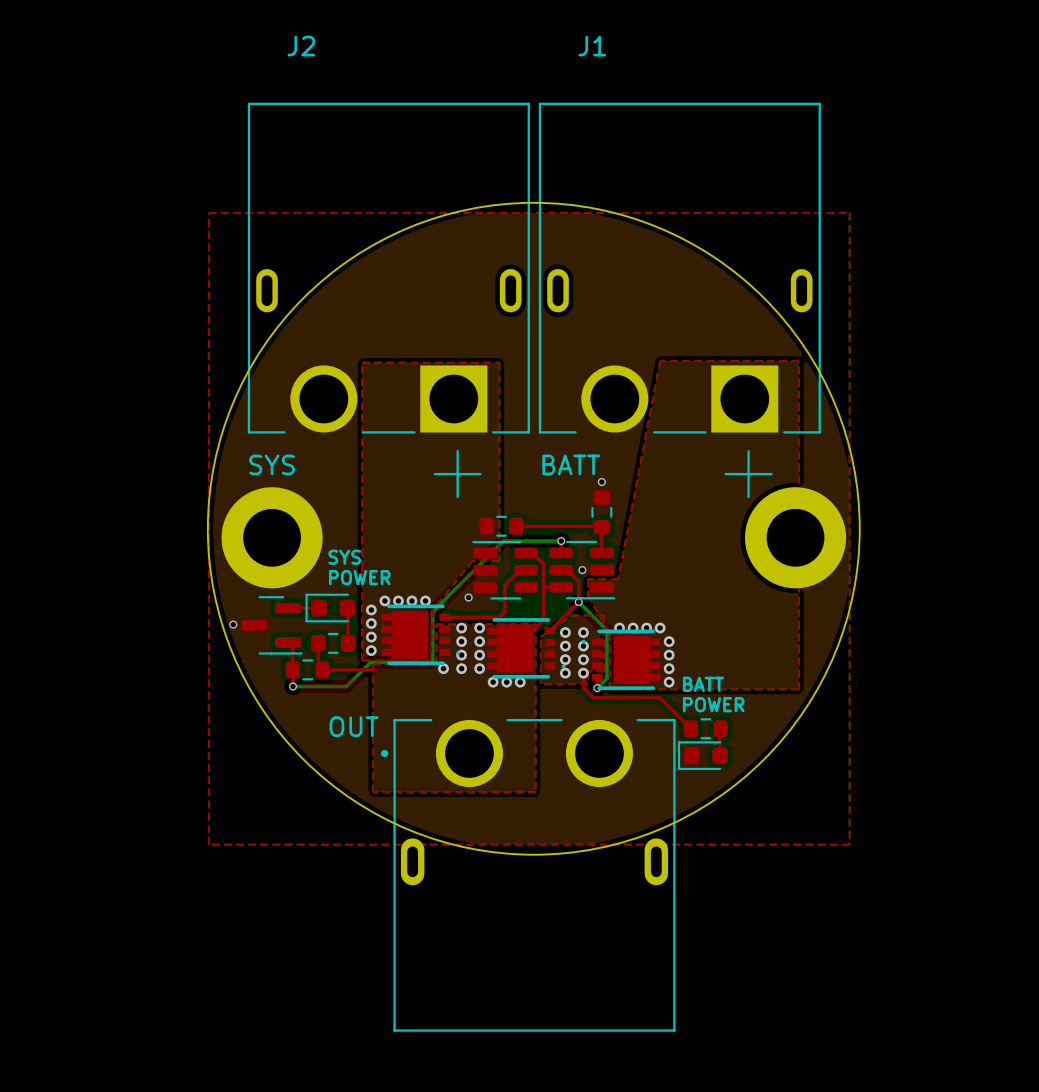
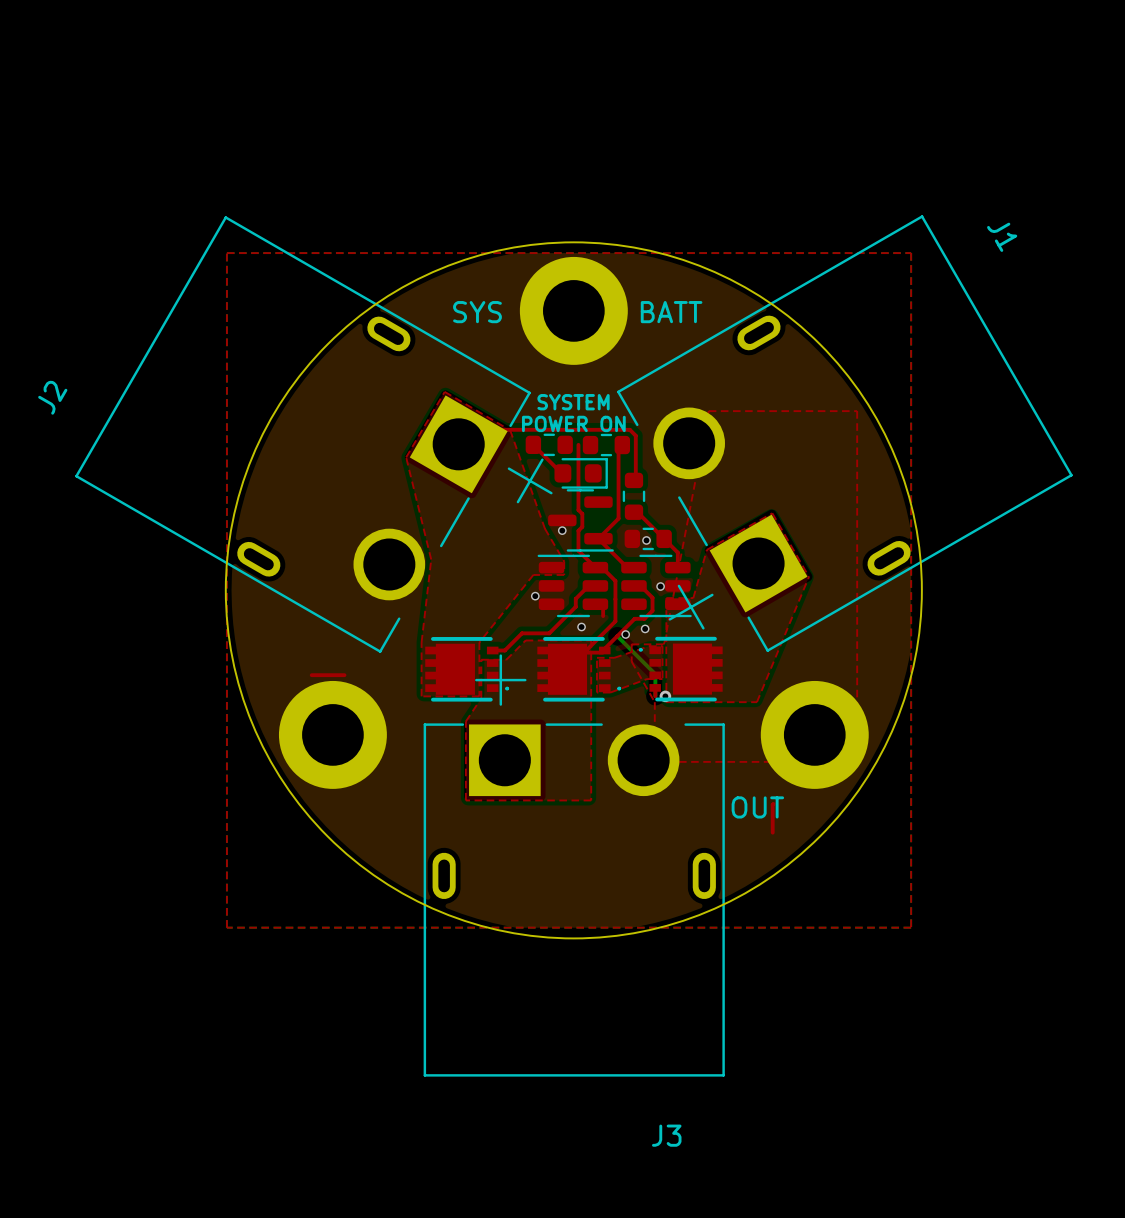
part: none -> (573, 310)
text: none -> SYS (477, 312)
J2 rotation: 0° (388, 300) -> 60° counterclockwise (313, 434)
J1 rotation: 0° (679, 300) -> 60° clockwise (844, 433)
text: none -> SYSTEM (573, 402)
top zone outline: (362, 362) (362, 660) (430, 660) (432, 609) (472, 561) (499, 561) (499, 362) (362, 362) -> (444, 391) (406, 457) (431, 559) (421, 642) (421, 696) (479, 696) (479, 642) (533, 574) (564, 574) (564, 561) (544, 528) (510, 430) (444, 391)
text: none -> POWER ON (573, 423)
top track: none -> (458, 444) (473, 429) (629, 429) (635, 435) (635, 478) (633, 480)
top track: none -> (533, 445) (562, 473)
part: none -> (549, 444)
top track: none -> (578, 444) (578, 510) (582, 513) (582, 526) (578, 530) (578, 550) (595, 567) (602, 567) (615, 580) (615, 621) (567, 669)
part: none -> (606, 445)
top track: none -> (622, 445) (618, 448) (618, 518) (598, 538)
part: none -> (581, 473)
part: none -> (633, 496)
top track: none -> (633, 512) (637, 512) (677, 552) (677, 567)
top zone outline: none -> (772, 513) (808, 576) (756, 702) (666, 702) (666, 598) (693, 598) (706, 549) (772, 513)
text: SYS (272, 464) -> none
text position: BATT (571, 464) -> BATT (671, 312)
via: none -> (562, 530)
top track: none -> (598, 538) (627, 567) (633, 567)
part: none -> (648, 538)
part footprint: [591, 490, 613, 535] -> [621, 554, 692, 618]
part: none -> (572, 585)
top track: none -> (595, 585) (588, 585) (575, 598) (575, 606) (549, 633) (522, 633) (504, 650) (492, 650)
top track: none -> (633, 585) (640, 585) (652, 597) (652, 610) (644, 618) (634, 618) (617, 636)
via: none -> (660, 586)
part: (501, 526) -> none
top track: (516, 526) (600, 526) (602, 552) -> none
via: none -> (535, 596)
part: (272, 537) -> none
part position: (795, 537) -> (814, 734)
bottom track: (561, 541) (503, 541) (432, 611) (432, 662) (370, 662) (346, 686) (293, 686) -> none
via: (561, 541) -> none
top track: (526, 553) (532, 553) (543, 564) (543, 619) (515, 648) -> none
text: SYS (344, 557) -> none
via: none -> (581, 626)
via: none -> (645, 628)
part: (505, 570) -> none
top track: (526, 570) (519, 570) (504, 585) (504, 611) (499, 617) (444, 617) -> none
top track: (561, 570) (567, 570) (578, 581) (578, 602) (550, 630) -> none
part: (582, 570) -> none
top track: none -> (617, 636) (604, 650)
bottom track: none -> (617, 636) (655, 674) (655, 696)
top zone outline: none -> (525, 640) (506, 659) (481, 659) (481, 698) (465, 721) (465, 800) (591, 800) (591, 640) (525, 640)
text: POWER (359, 577) -> none
top zone outline: none -> (649, 646) (614, 657) (596, 657) (596, 692) (610, 692) (647, 679) (662, 679) (662, 646) (649, 646)
via: (468, 597) -> none
via: (384, 600) -> none
via: (398, 600) -> none
via: (411, 600) -> none
via: (425, 600) -> none
bottom track: (578, 602) (606, 630) (606, 678) (597, 688) -> none
via: (578, 602) -> none
part: none -> (680, 669)
part: (330, 608) -> none
top track: (347, 608) (348, 643) -> none
via: (371, 609) -> none
top zone outline: (571, 615) (604, 615) (604, 671) (587, 671) (587, 684) (541, 684) (541, 637) (571, 615) -> none
top track: none -> (655, 688) (655, 696)
via: (371, 623) -> none
via: (233, 624) -> none
top zone outline: (436, 624) (535, 624) (535, 792) (373, 792) (373, 664) (436, 664) (436, 624) -> none
part position: (271, 625) -> (580, 520)
via: (461, 628) -> none
via: (479, 628) -> none
via: (633, 628) -> none
via: (646, 628) -> none
via: (660, 628) -> none
via: (565, 632) -> none
via: (583, 632) -> none
part position: (420, 634) -> (467, 669)
via: (371, 637) -> none
via: (461, 641) -> none
via: (479, 641) -> none
via: (669, 641) -> none
top track: (318, 643) (318, 665) (322, 669) (375, 669) -> none
part: (333, 643) -> none
via: (565, 646) -> none
via: (583, 646) -> none
part position: (526, 648) -> (579, 669)
via: (371, 650) -> none
via: (461, 655) -> none
via: (479, 655) -> none
via: (669, 655) -> none
part footprint: [285, 659, 330, 681] -> [278, 680, 387, 789]
via: (565, 659) -> none
via: (583, 659) -> none
part: (621, 659) -> none
via: (443, 668) -> none
via: (461, 668) -> none
via: (479, 668) -> none
via: (669, 668) -> none
via: (565, 673) -> none
top track: (583, 673) (583, 687) (593, 697) (659, 697) (690, 728) -> none
via: (583, 673) -> none
via: (493, 682) -> none
via: (506, 682) -> none
via: (520, 682) -> none
via: (669, 682) -> none
text: BATT (703, 684) -> none
via: (293, 686) -> none
via: (597, 688) -> none
text: POWER (713, 704) -> none
text position: OUT (354, 726) -> OUT (757, 807)
part: (705, 728) -> none
part: (702, 755) -> none
J3: none -> (574, 865)
part: (528, 875) -> none

